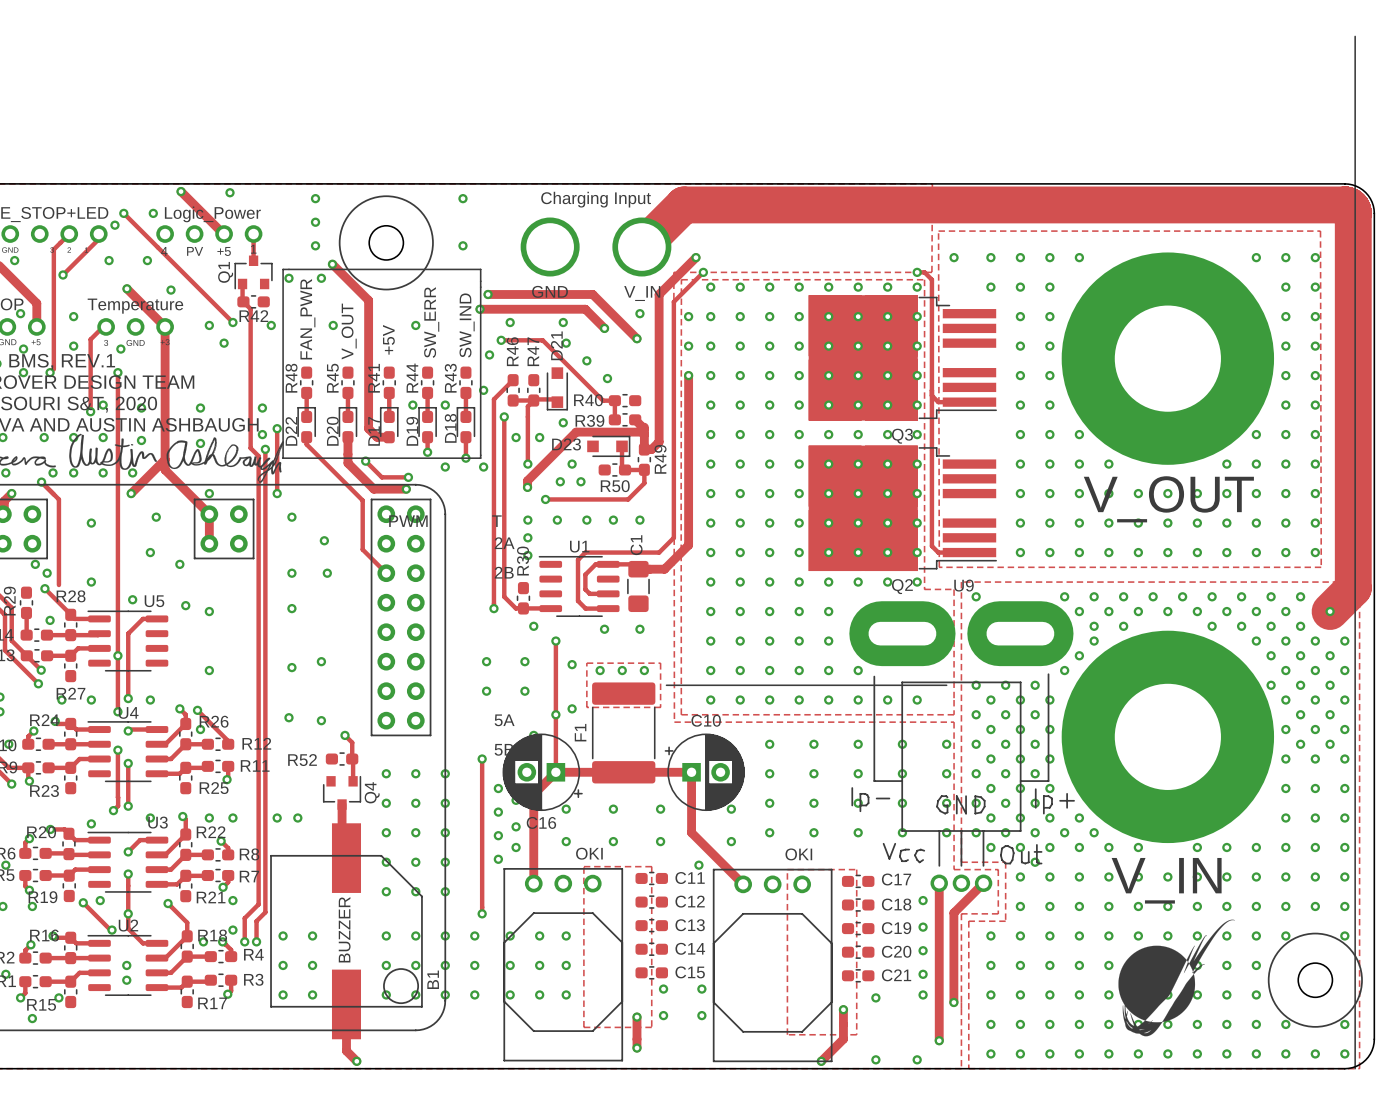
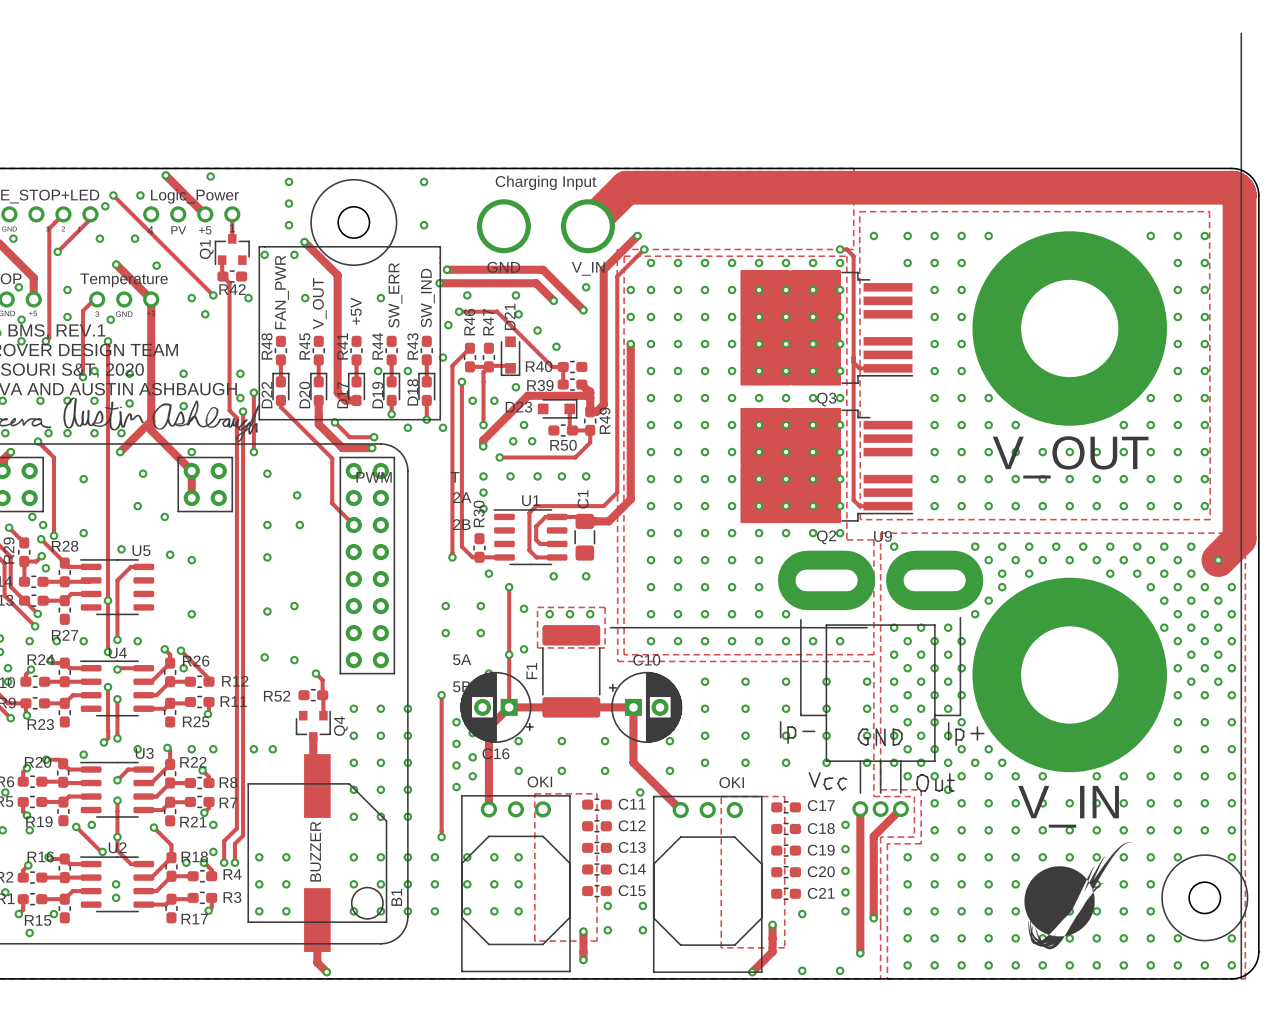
track: none -> (9, 527) (24, 542)
via: none -> (9, 527)
via: none -> (53, 535)
track: none -> (41, 556) (36, 561) (24, 561)
via: none -> (41, 556)
via: none -> (29, 641)
via: none -> (8, 668)

